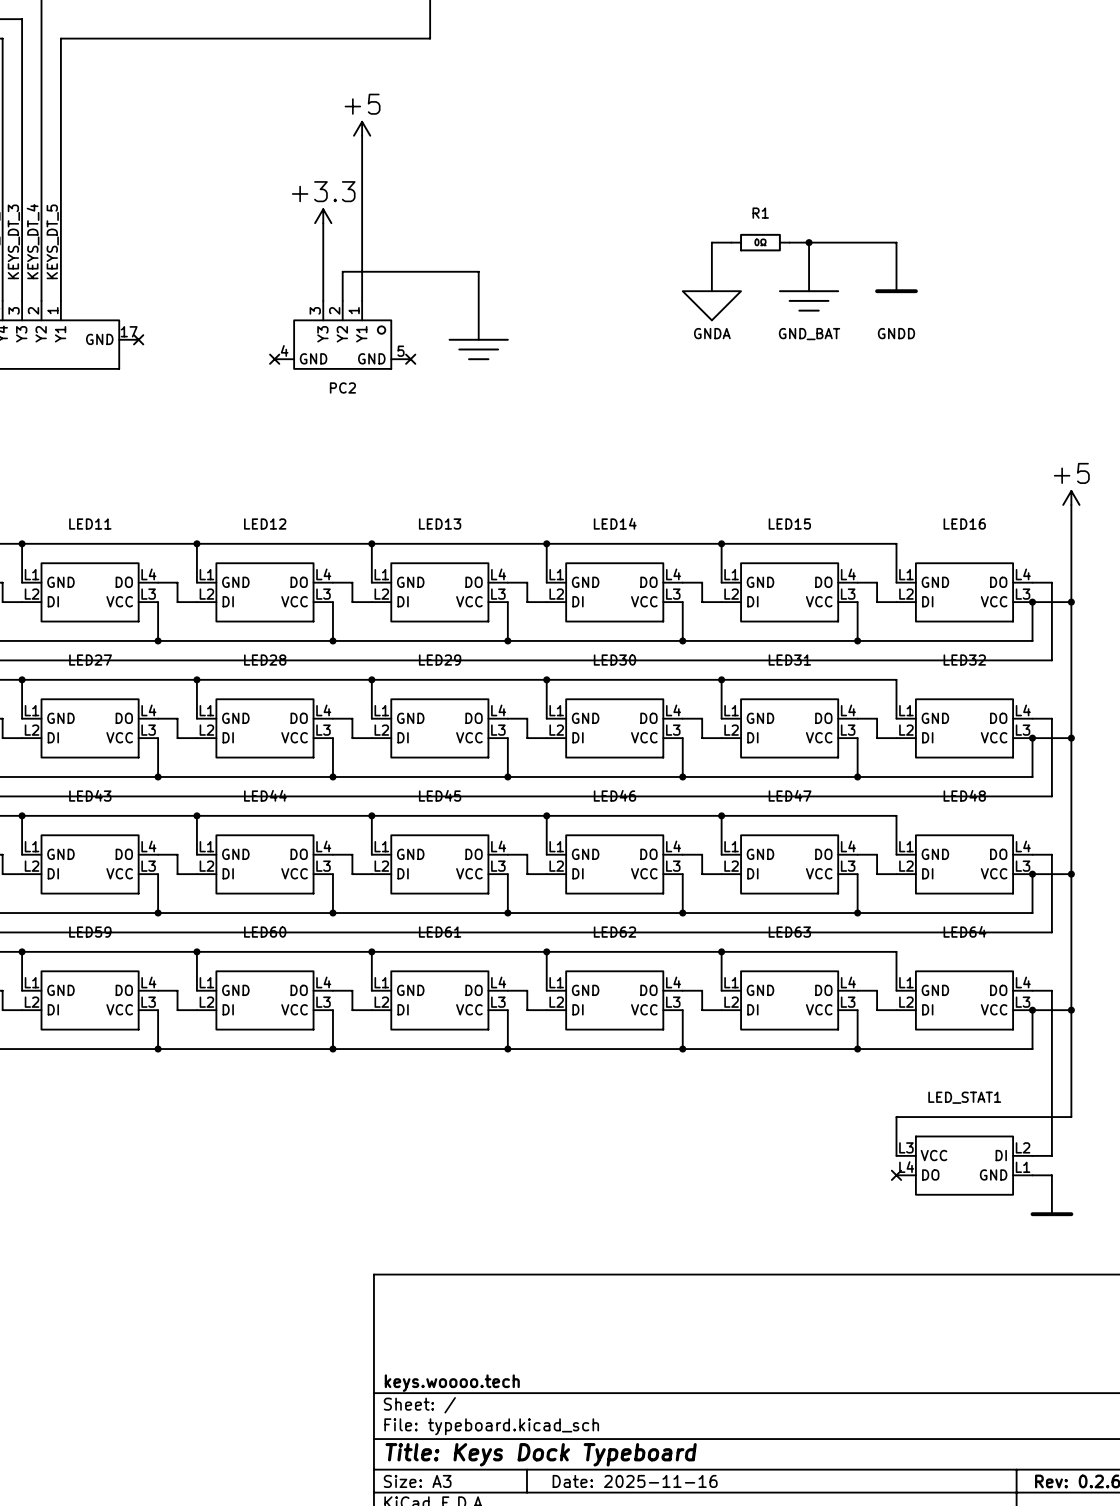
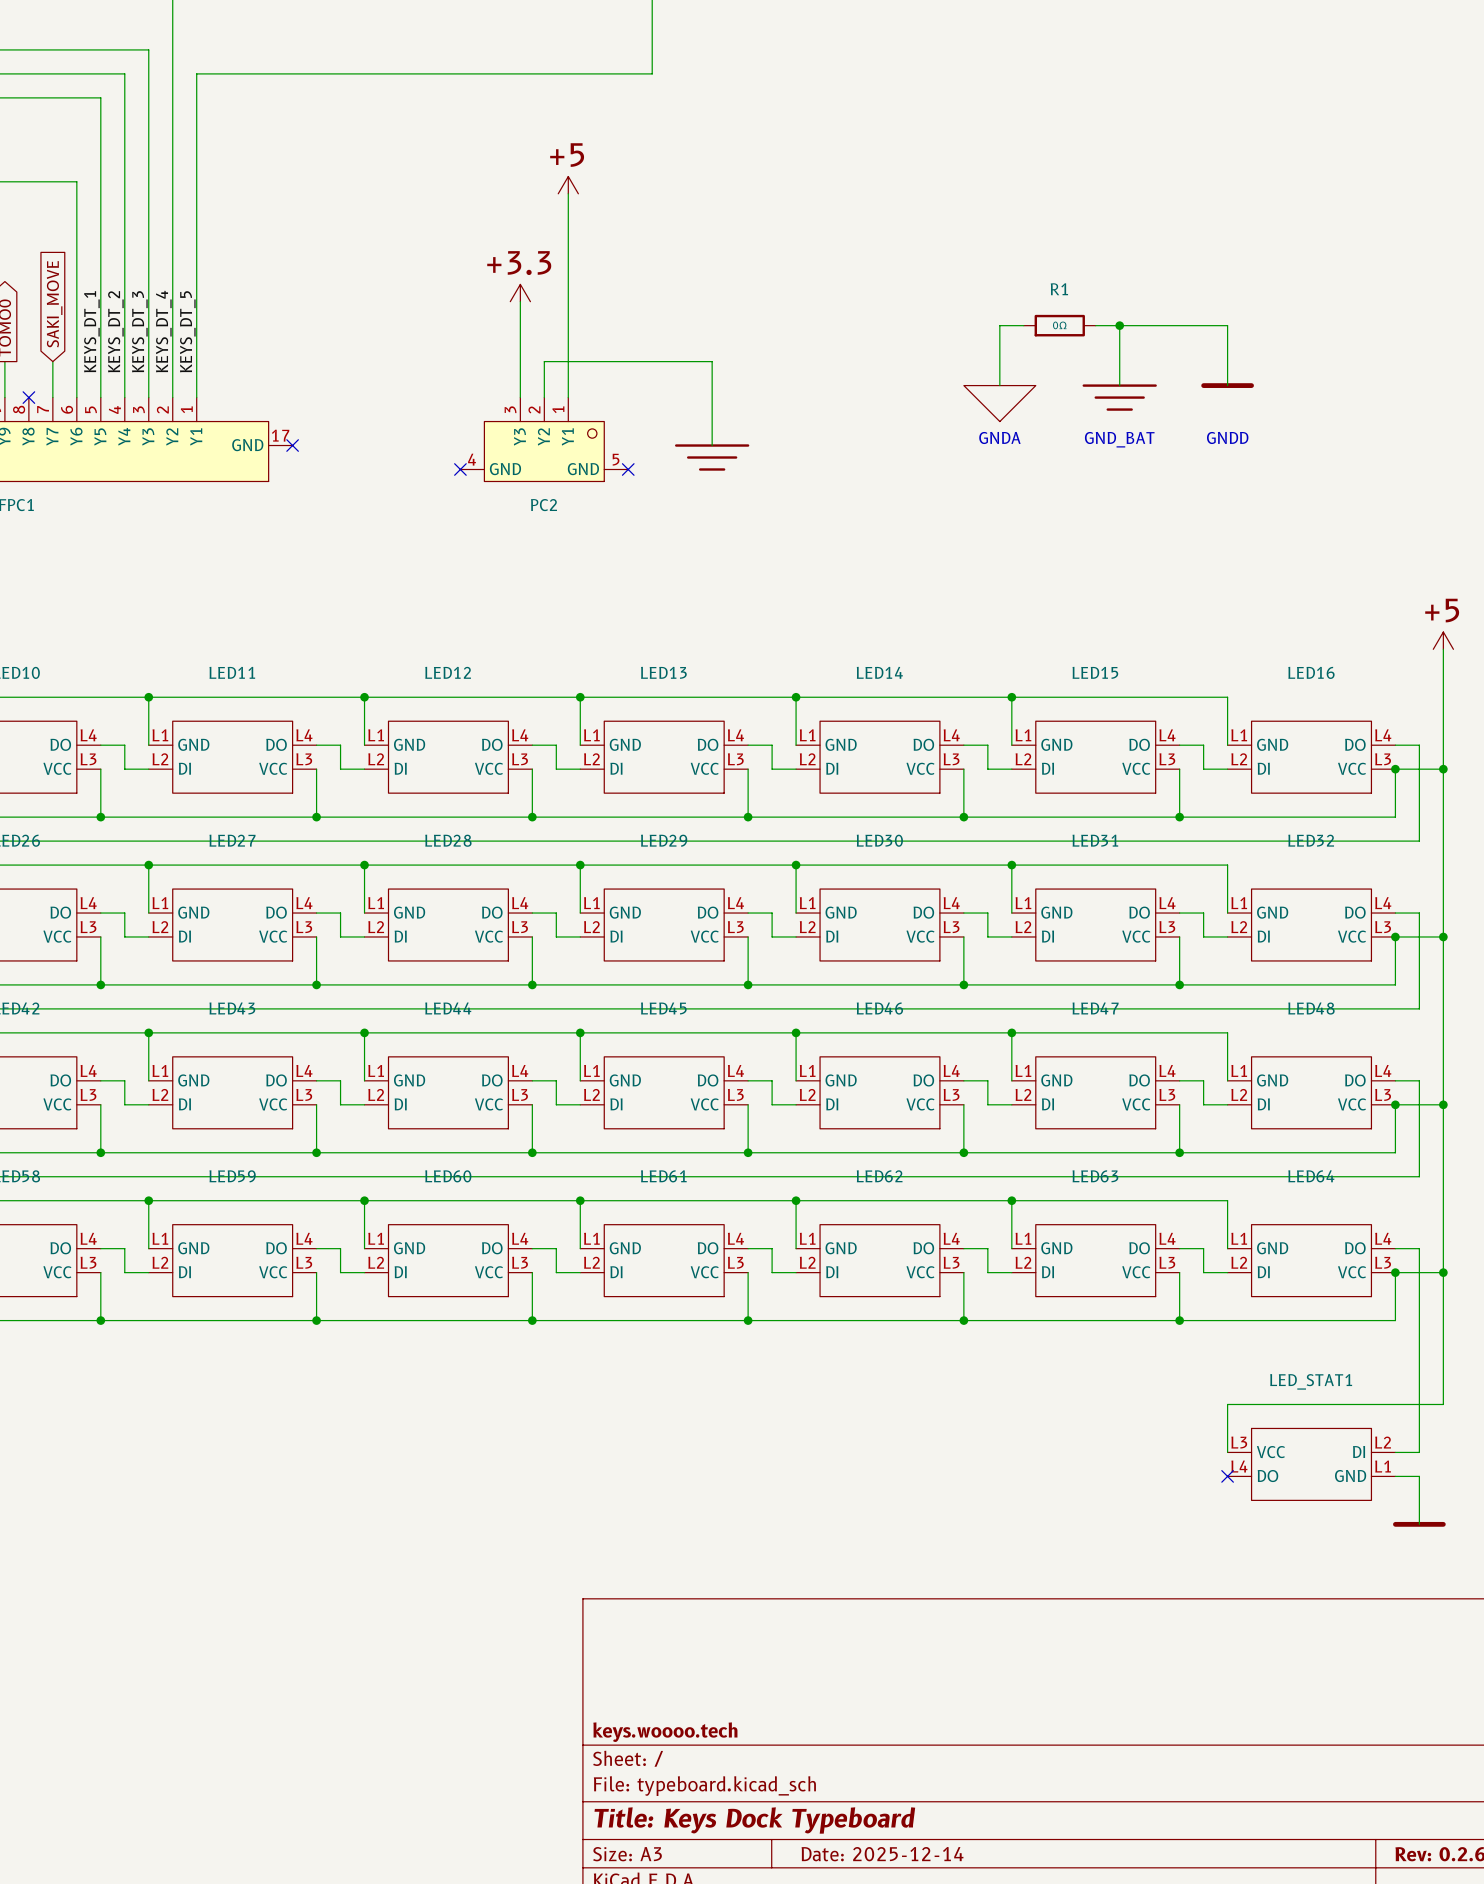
title block: Date: 2025-11-16 (635, 1481) -> Date: 2025-12-14 (882, 1854)

